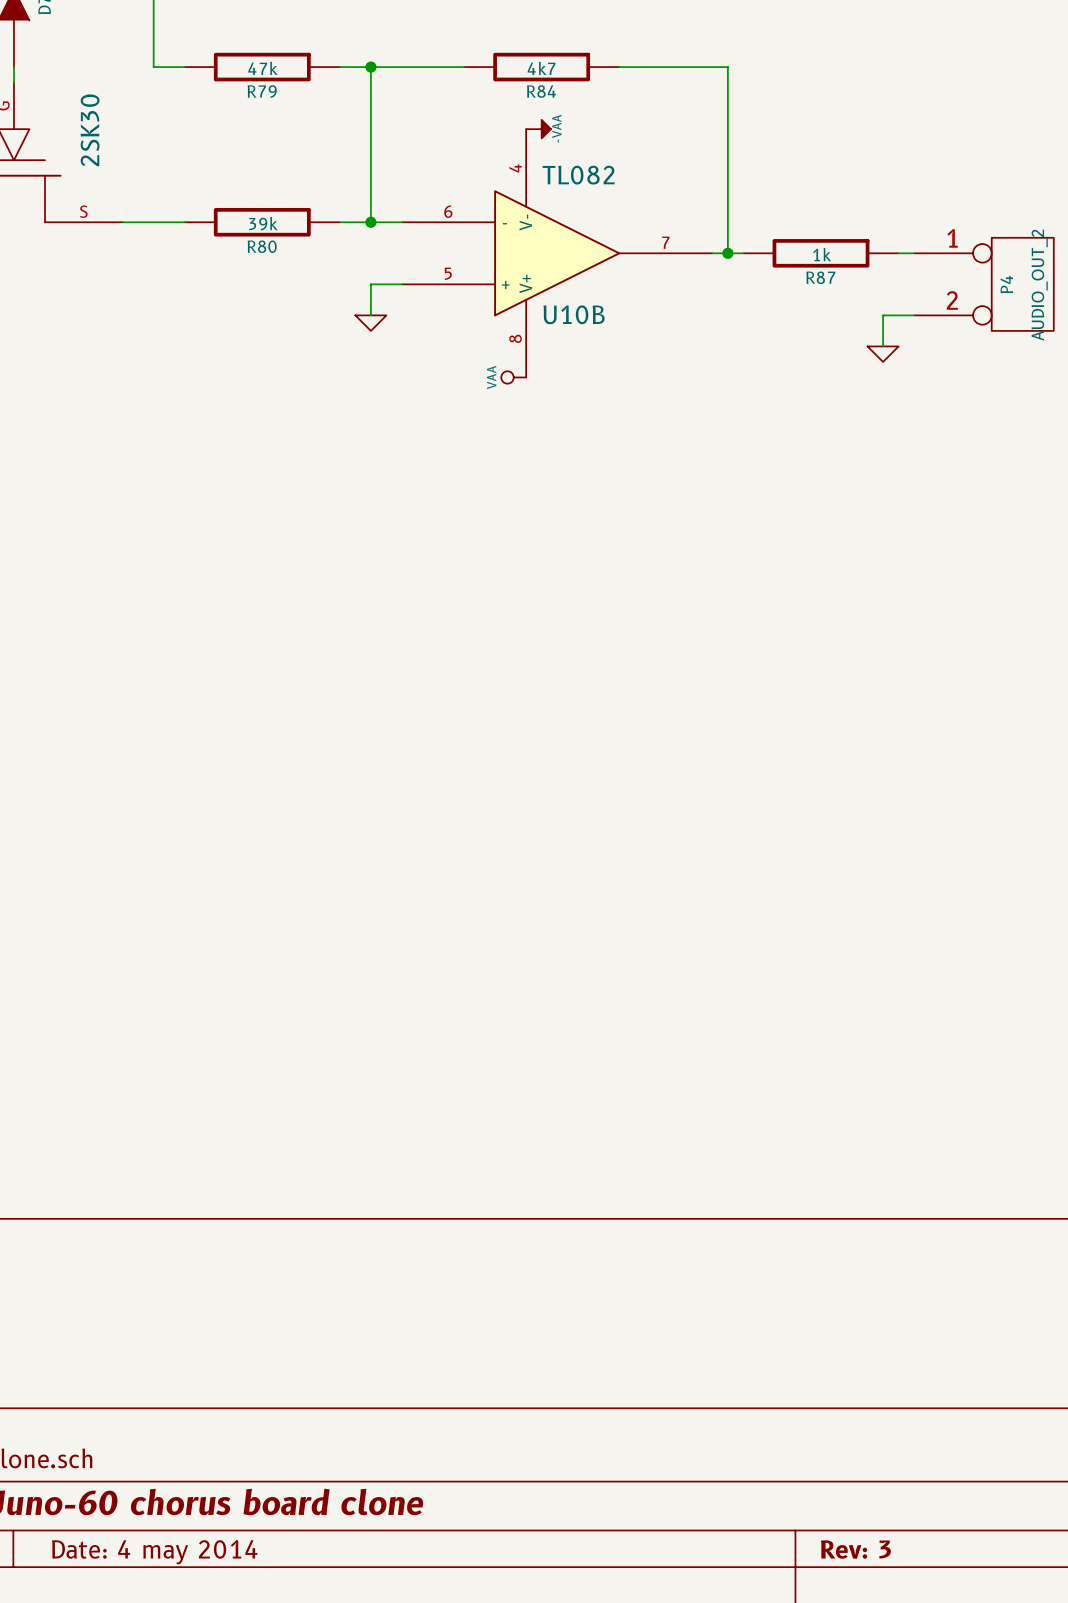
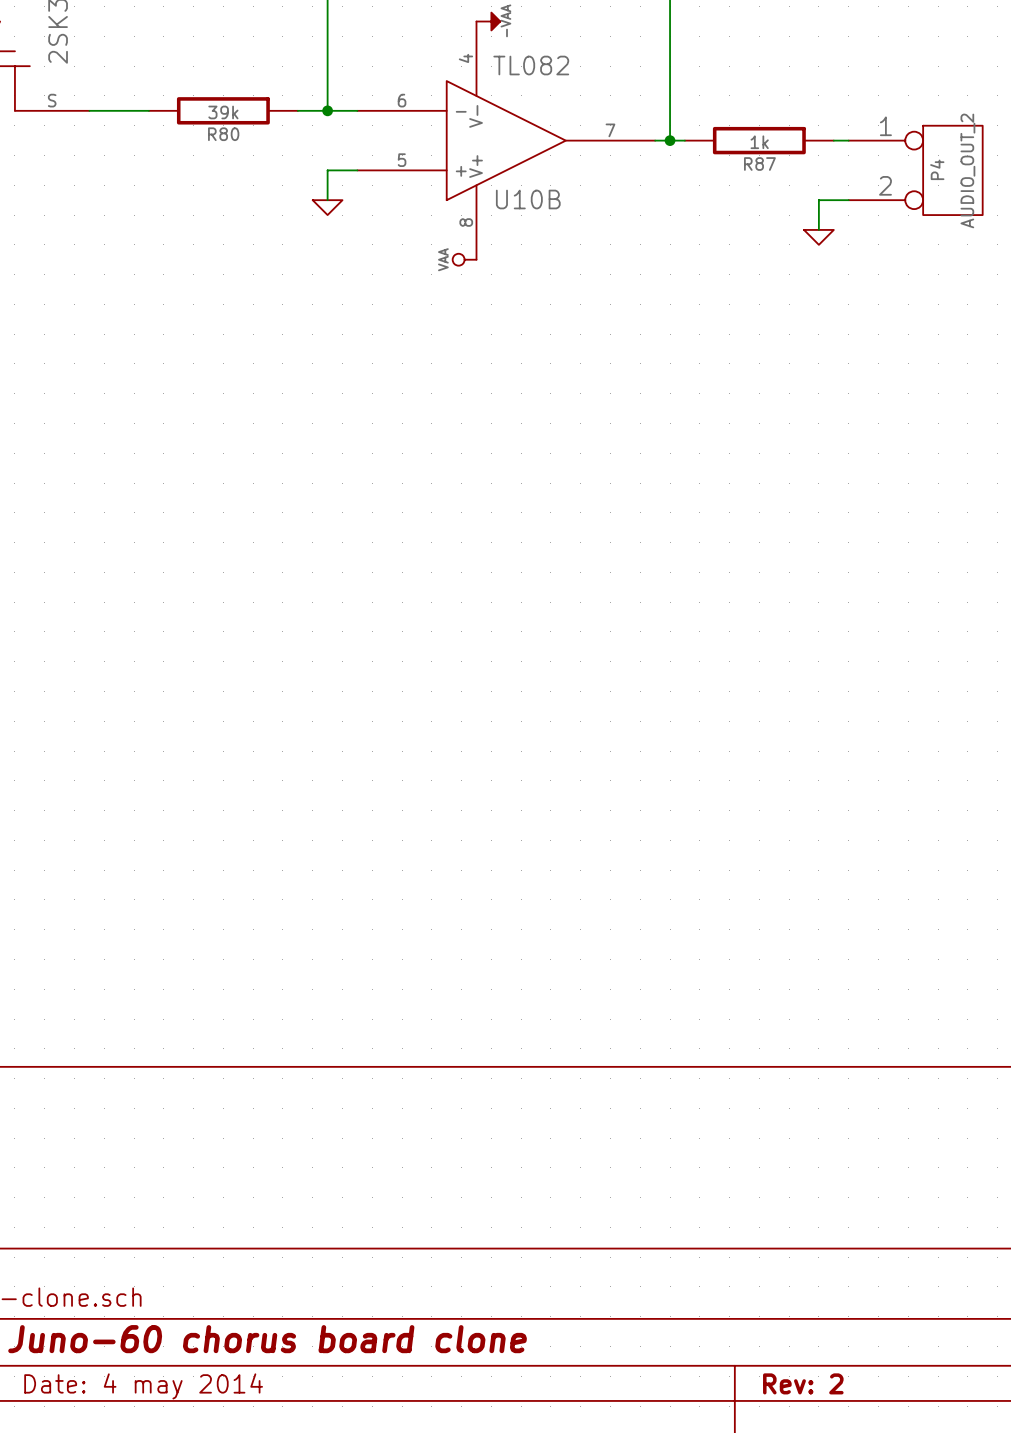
title block: Rev: 3 (855, 1549) -> Rev: 2 (803, 1383)

